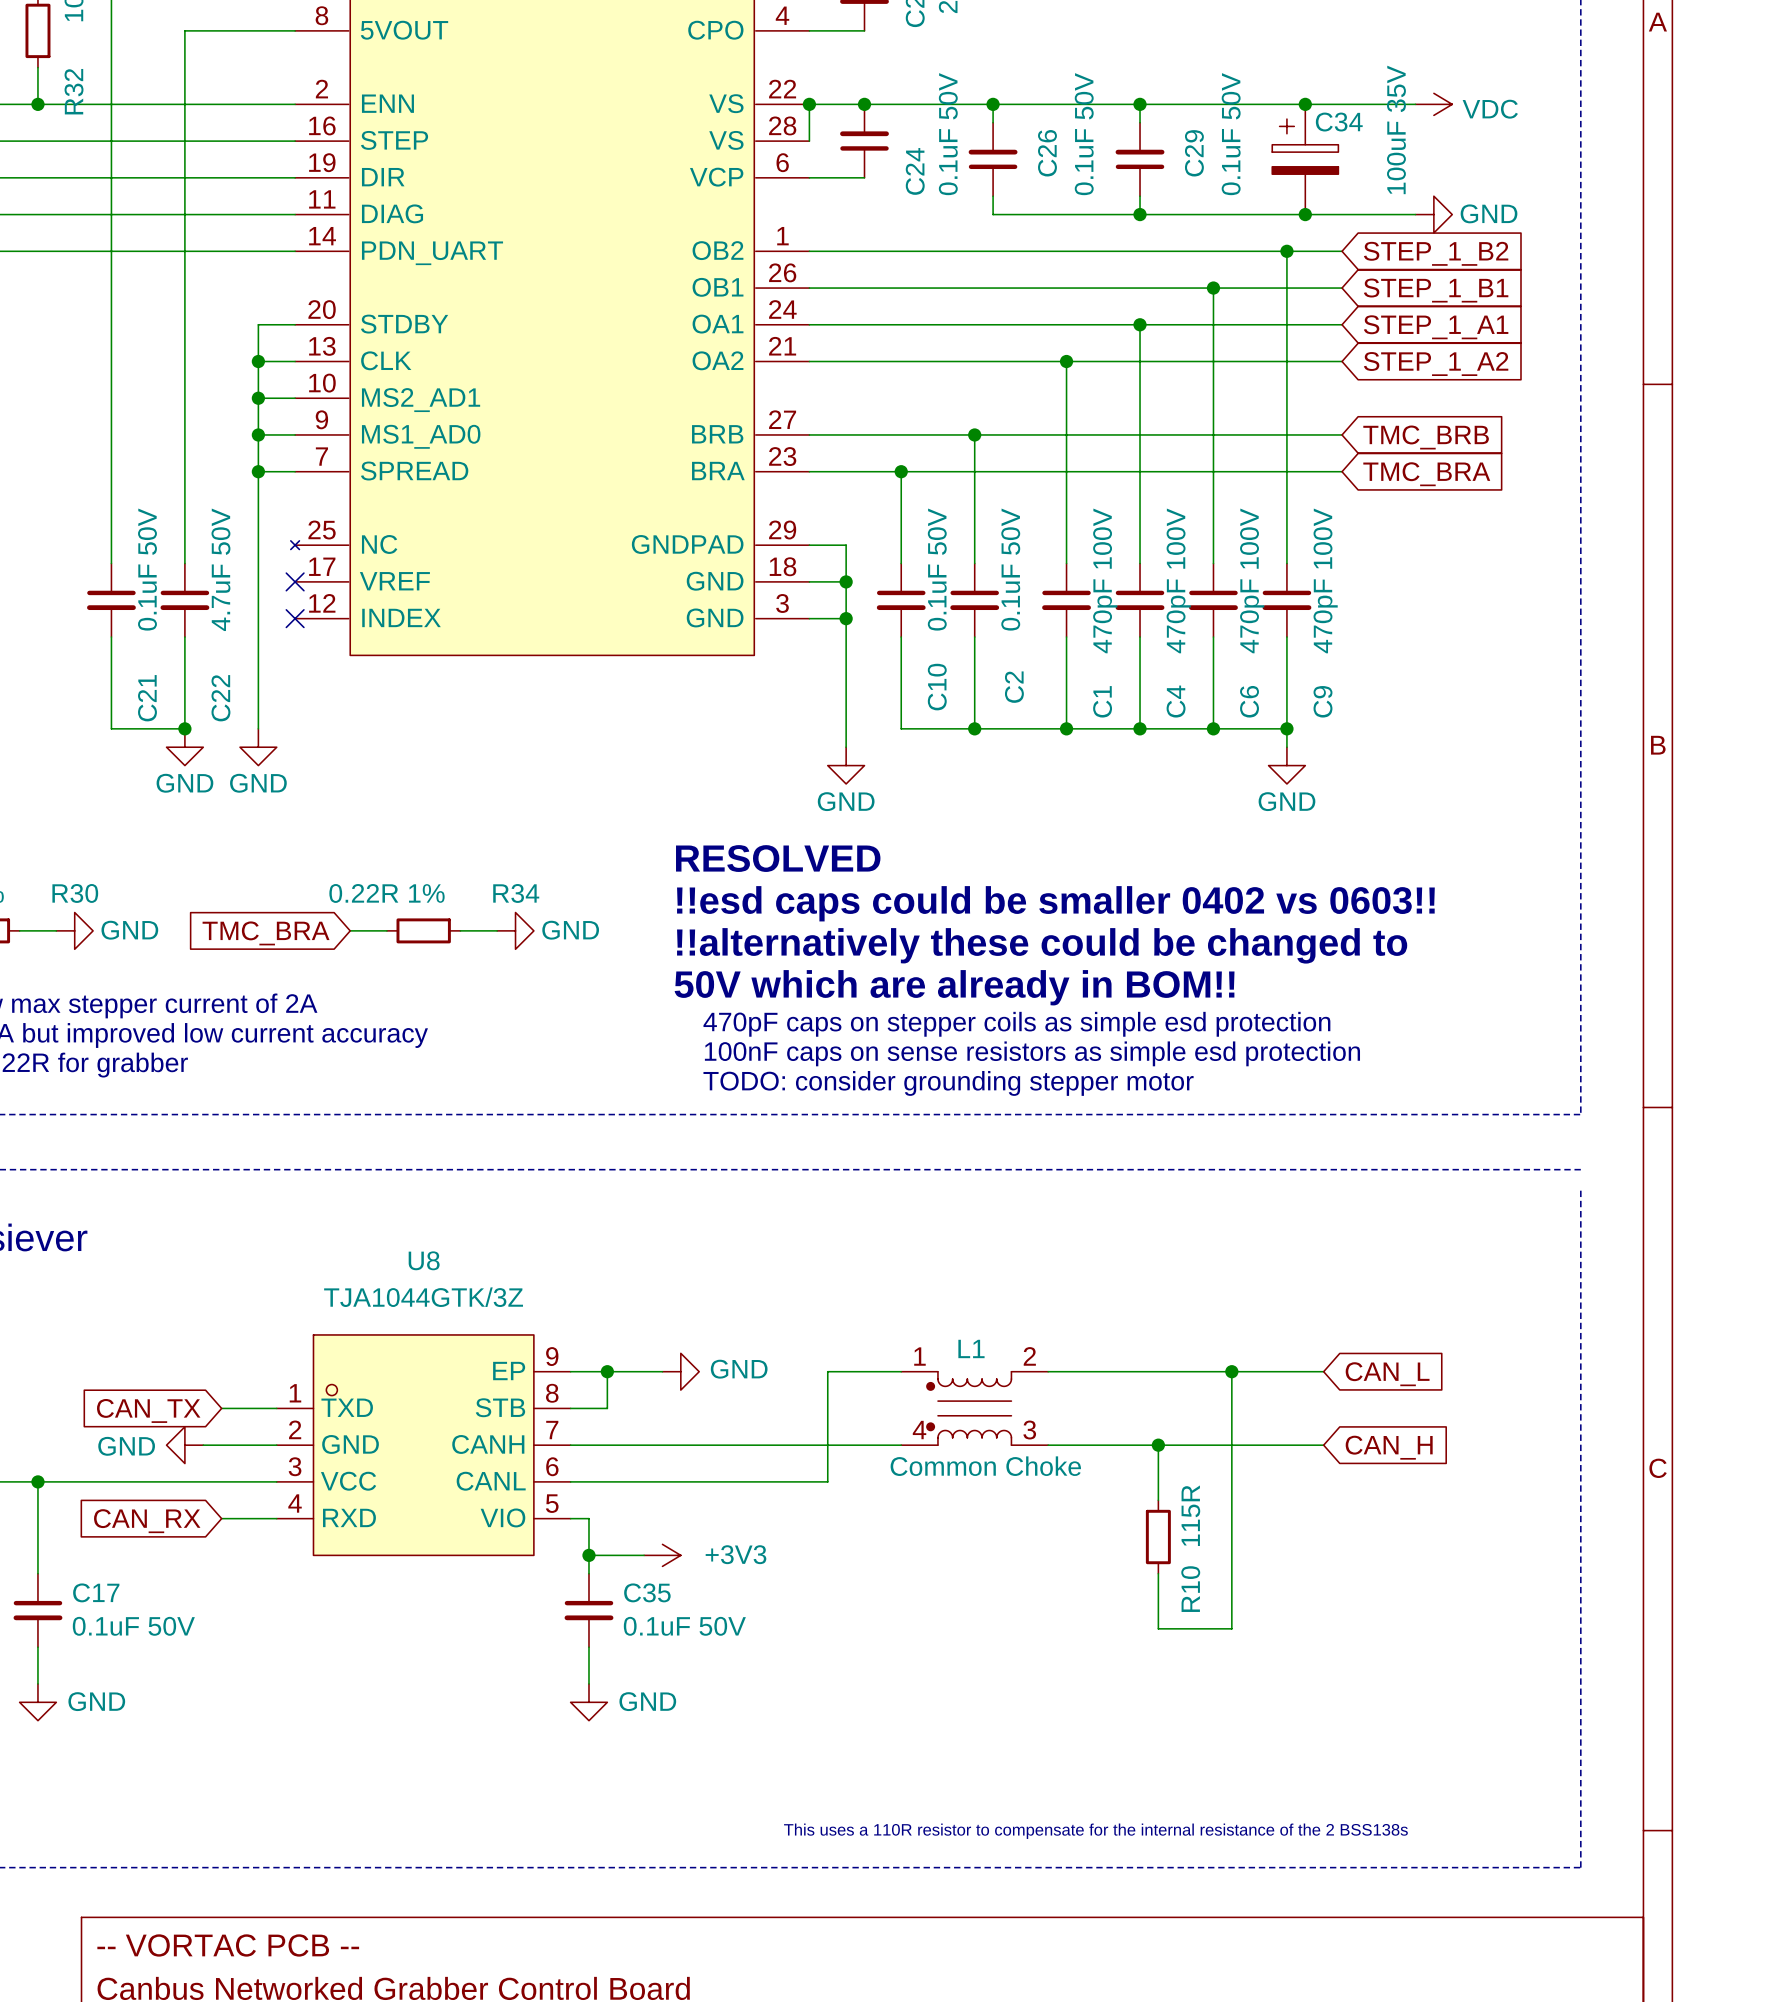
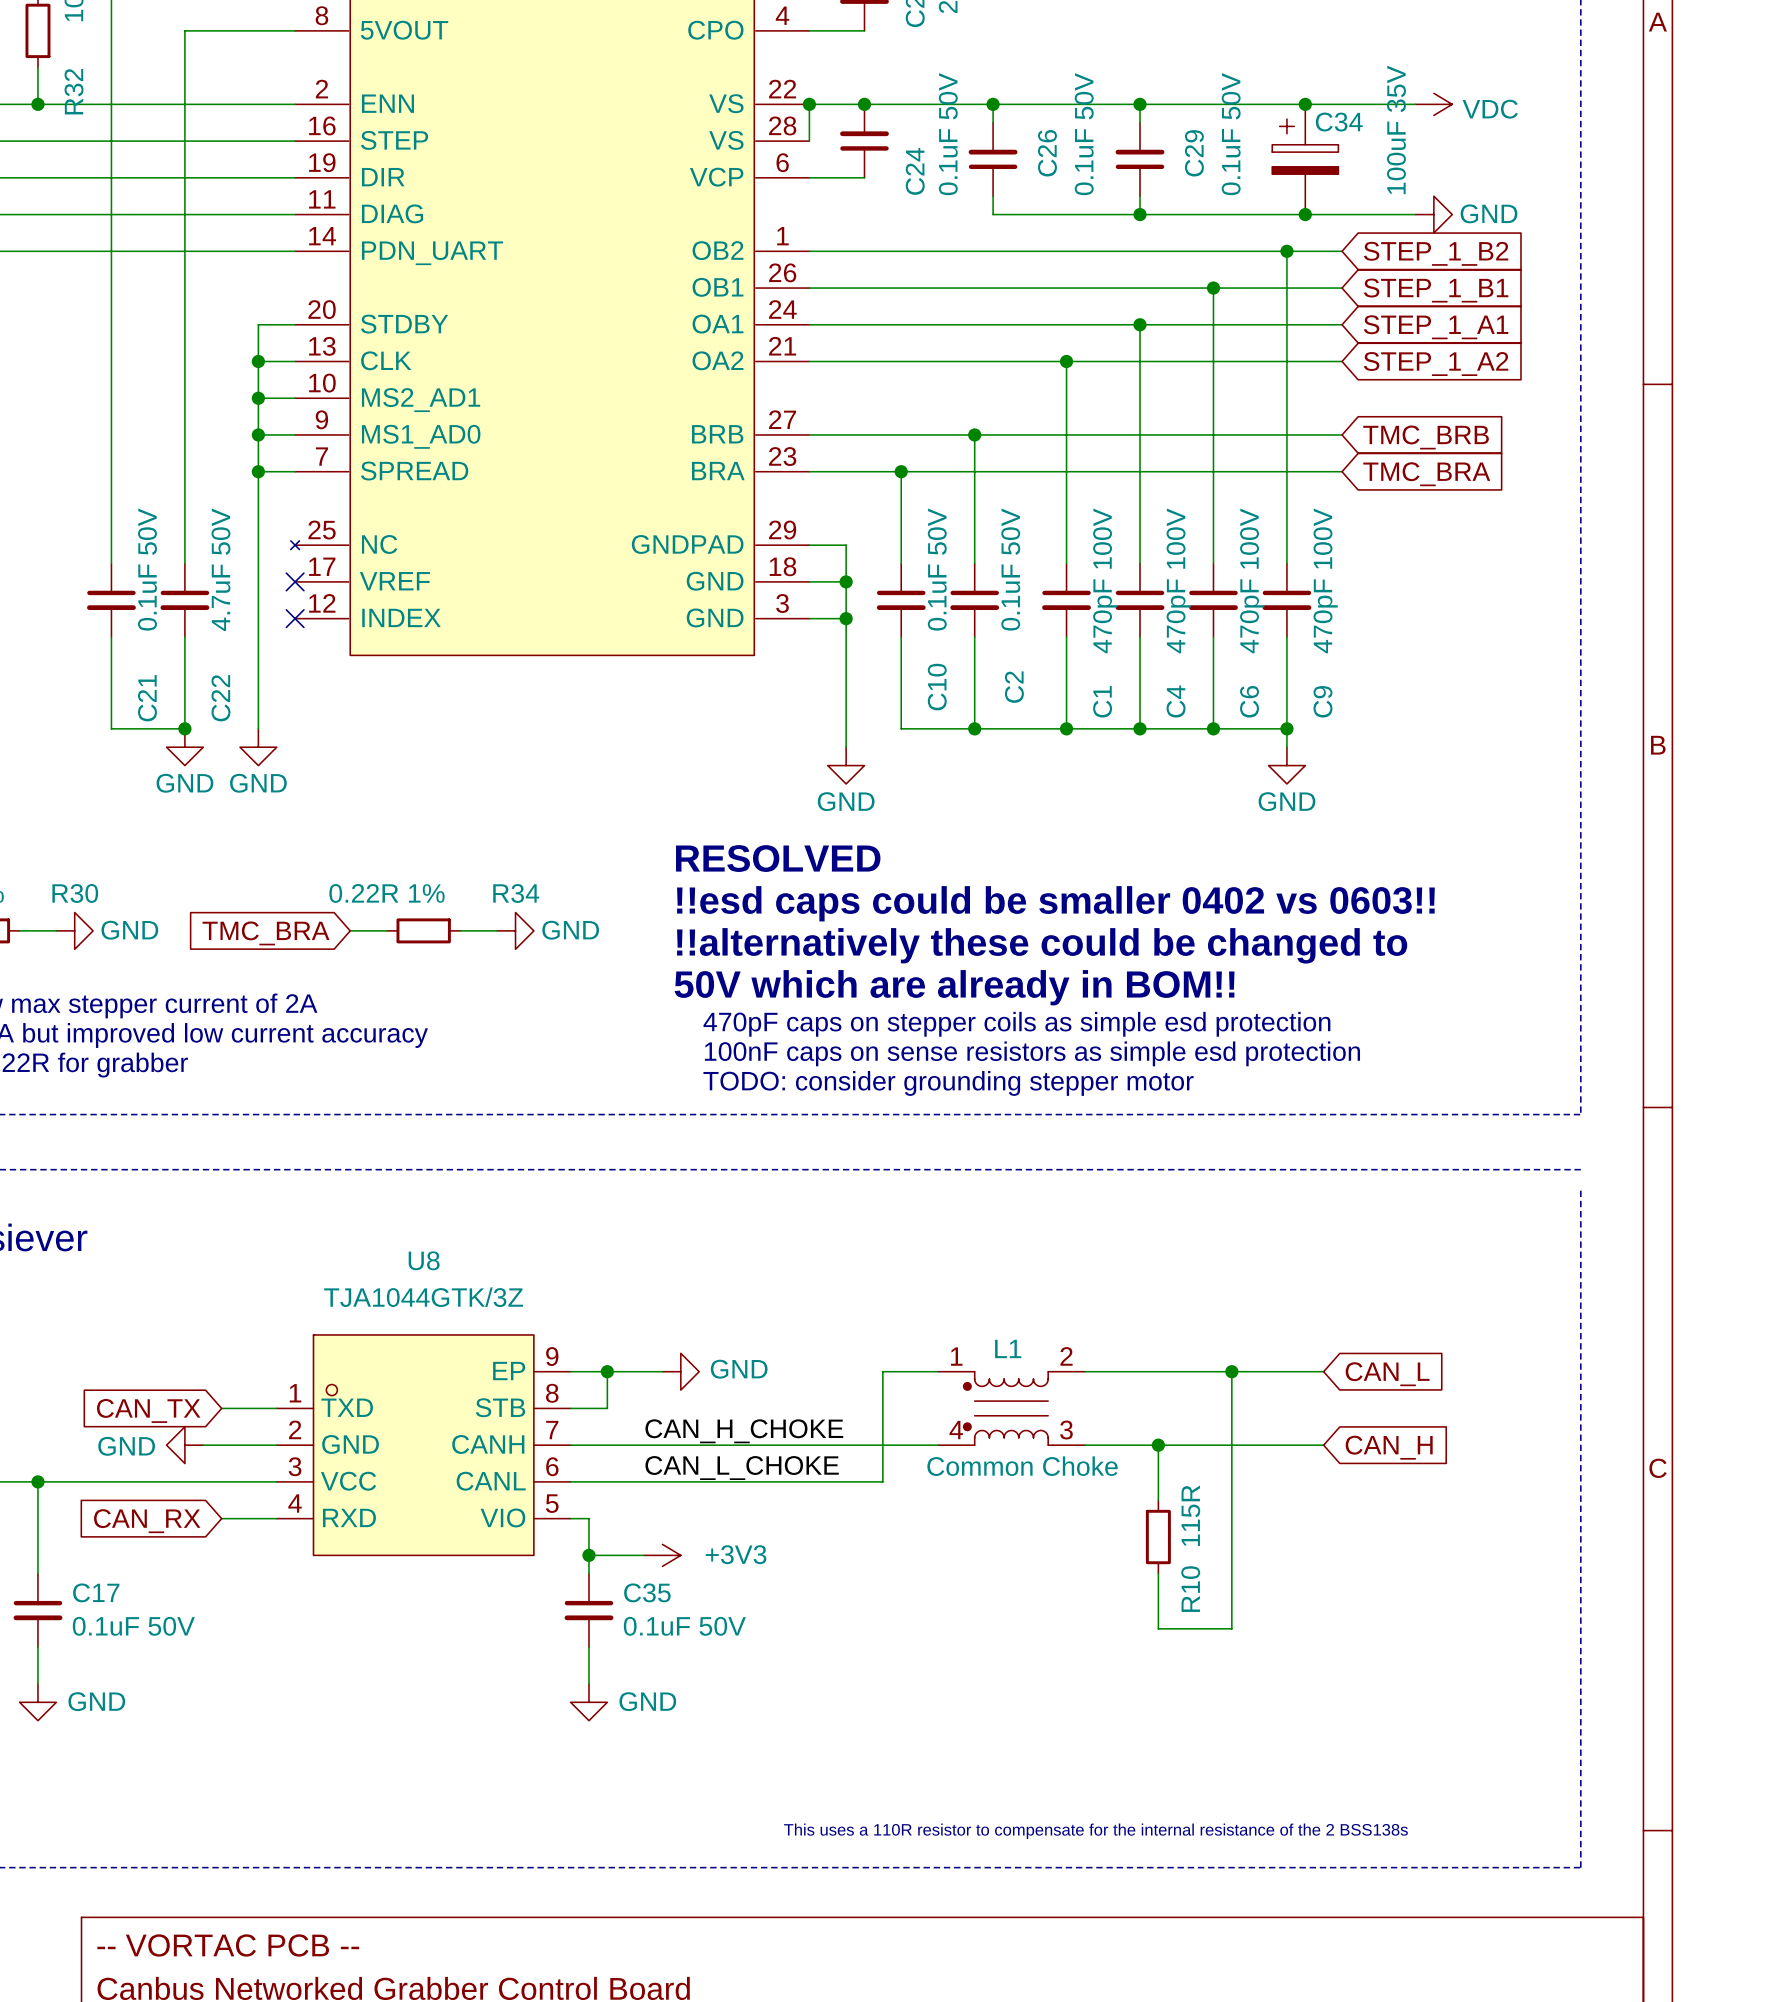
wire: (882, 1371) (827, 1371) (827, 1481) -> (882, 1371) (882, 1481) (827, 1481)
L1 position: (974, 1408) -> (1011, 1408)
label: none -> CAN_H_CHOKE (744, 1431)
label: none -> CAN_L_CHOKE (742, 1468)

